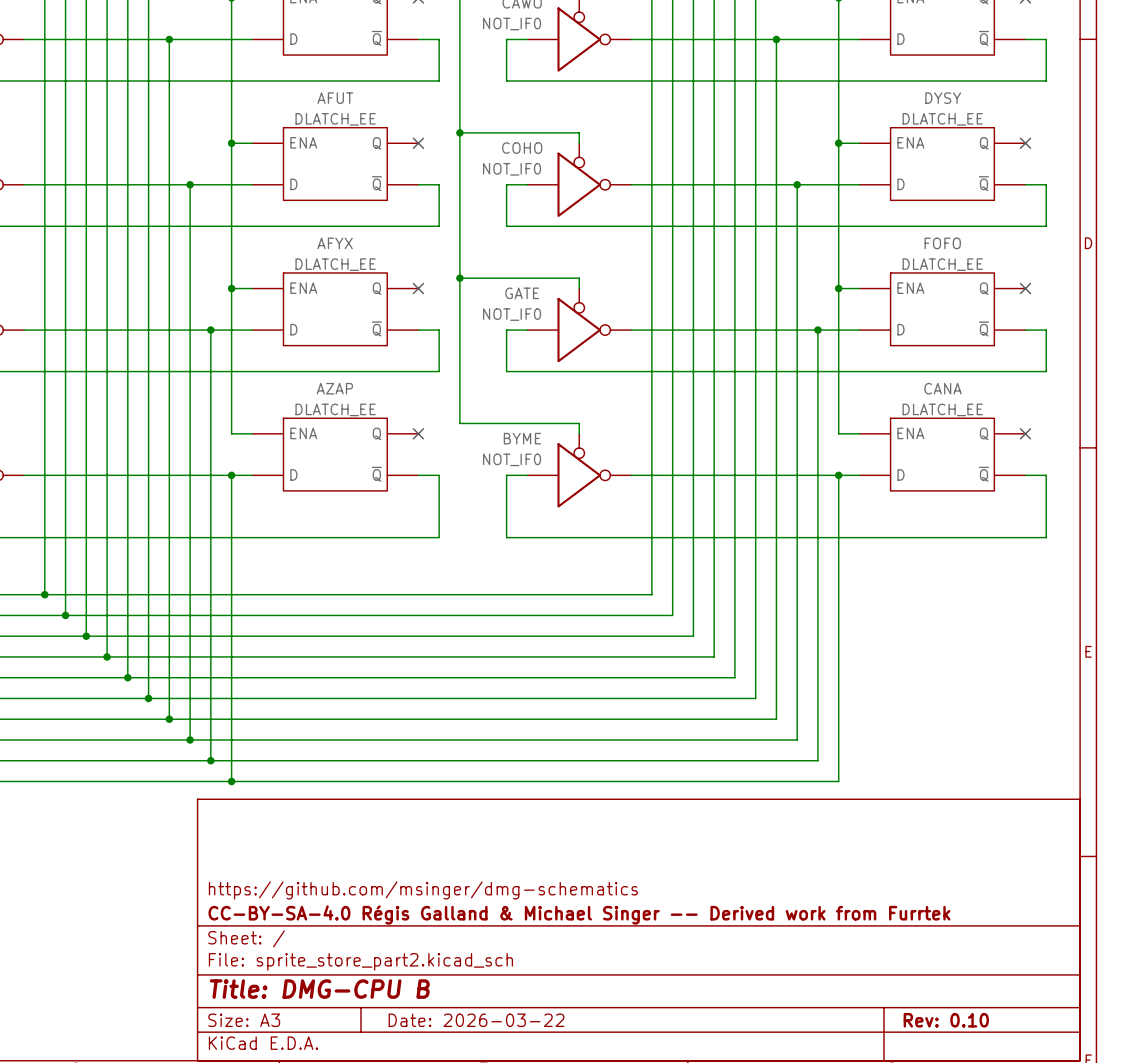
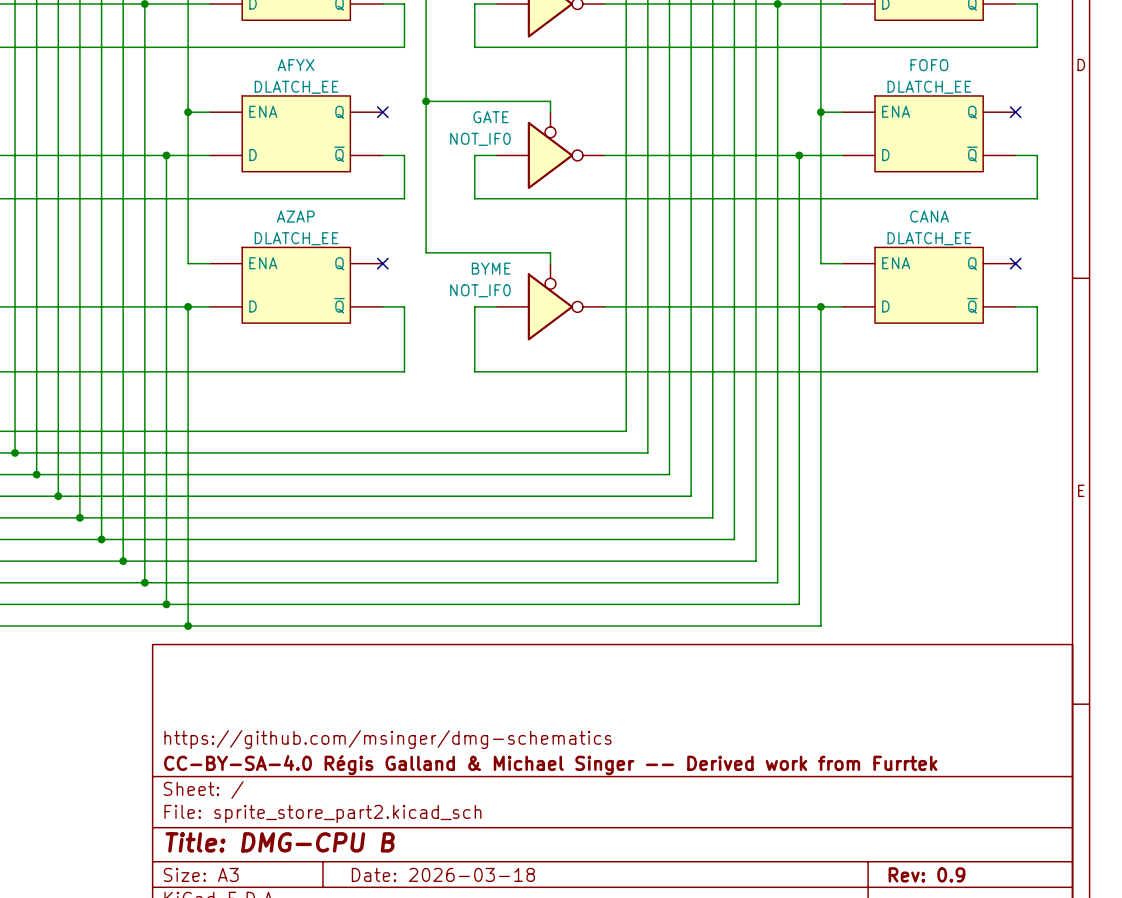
title block: Date: 2026-03-22 (476, 1020) -> Date: 2026-03-18 (443, 874)
title block: Rev: 0.10 (946, 1020) -> Rev: 0.9 (926, 874)

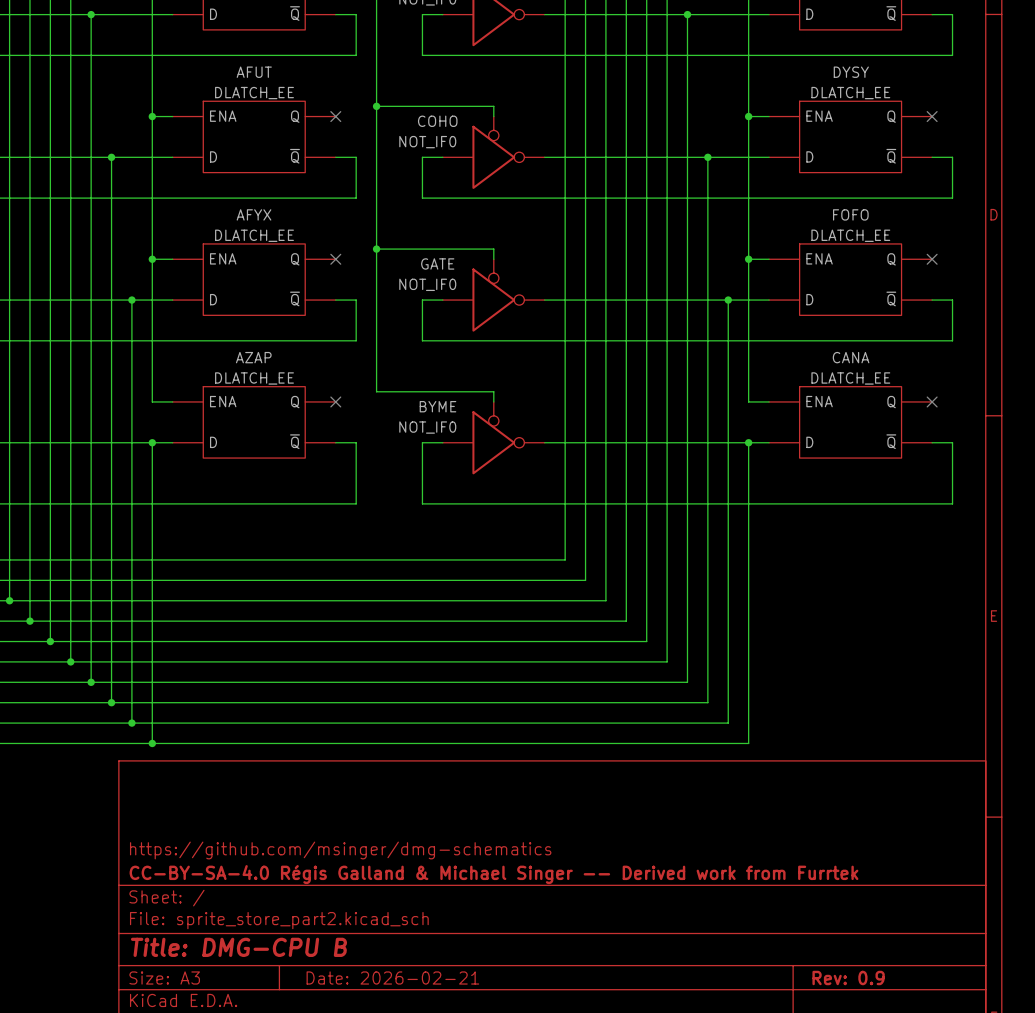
title block: Date: 2026-03-18 (443, 874) -> Date: 2026-02-21 (392, 977)

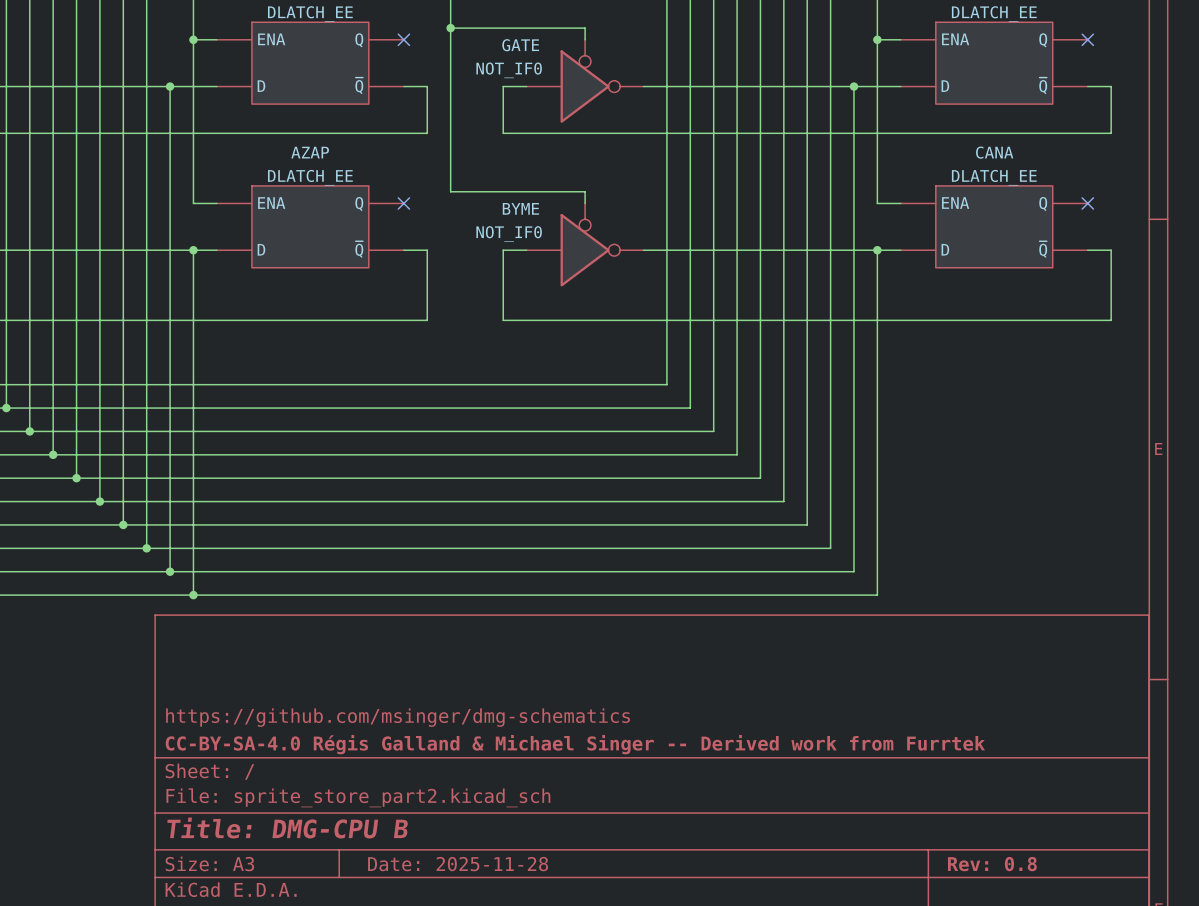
title block: Date: 2026-02-21 (392, 977) -> Date: 2025-11-28 (458, 864)
title block: Rev: 0.9 (848, 977) -> Rev: 0.8 (992, 864)

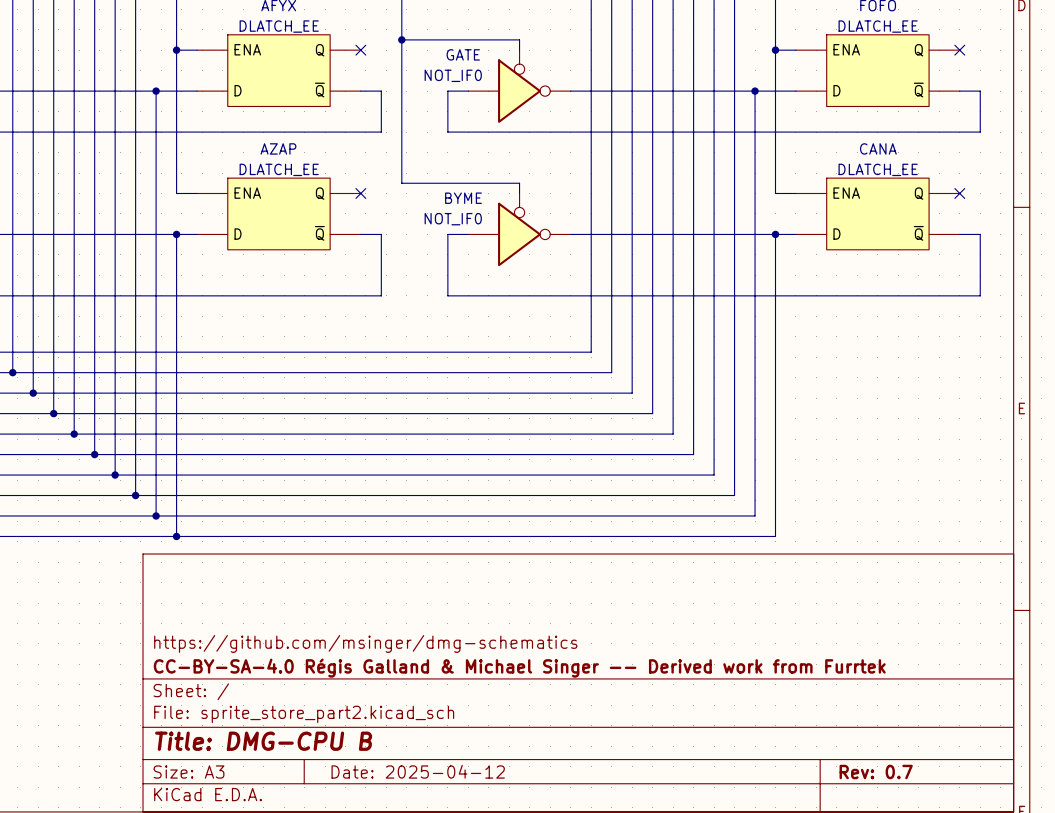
title block: Date: 2025-11-28 (458, 864) -> Date: 2025-04-12 (418, 771)
title block: Rev: 0.8 (992, 864) -> Rev: 0.7 (876, 772)

